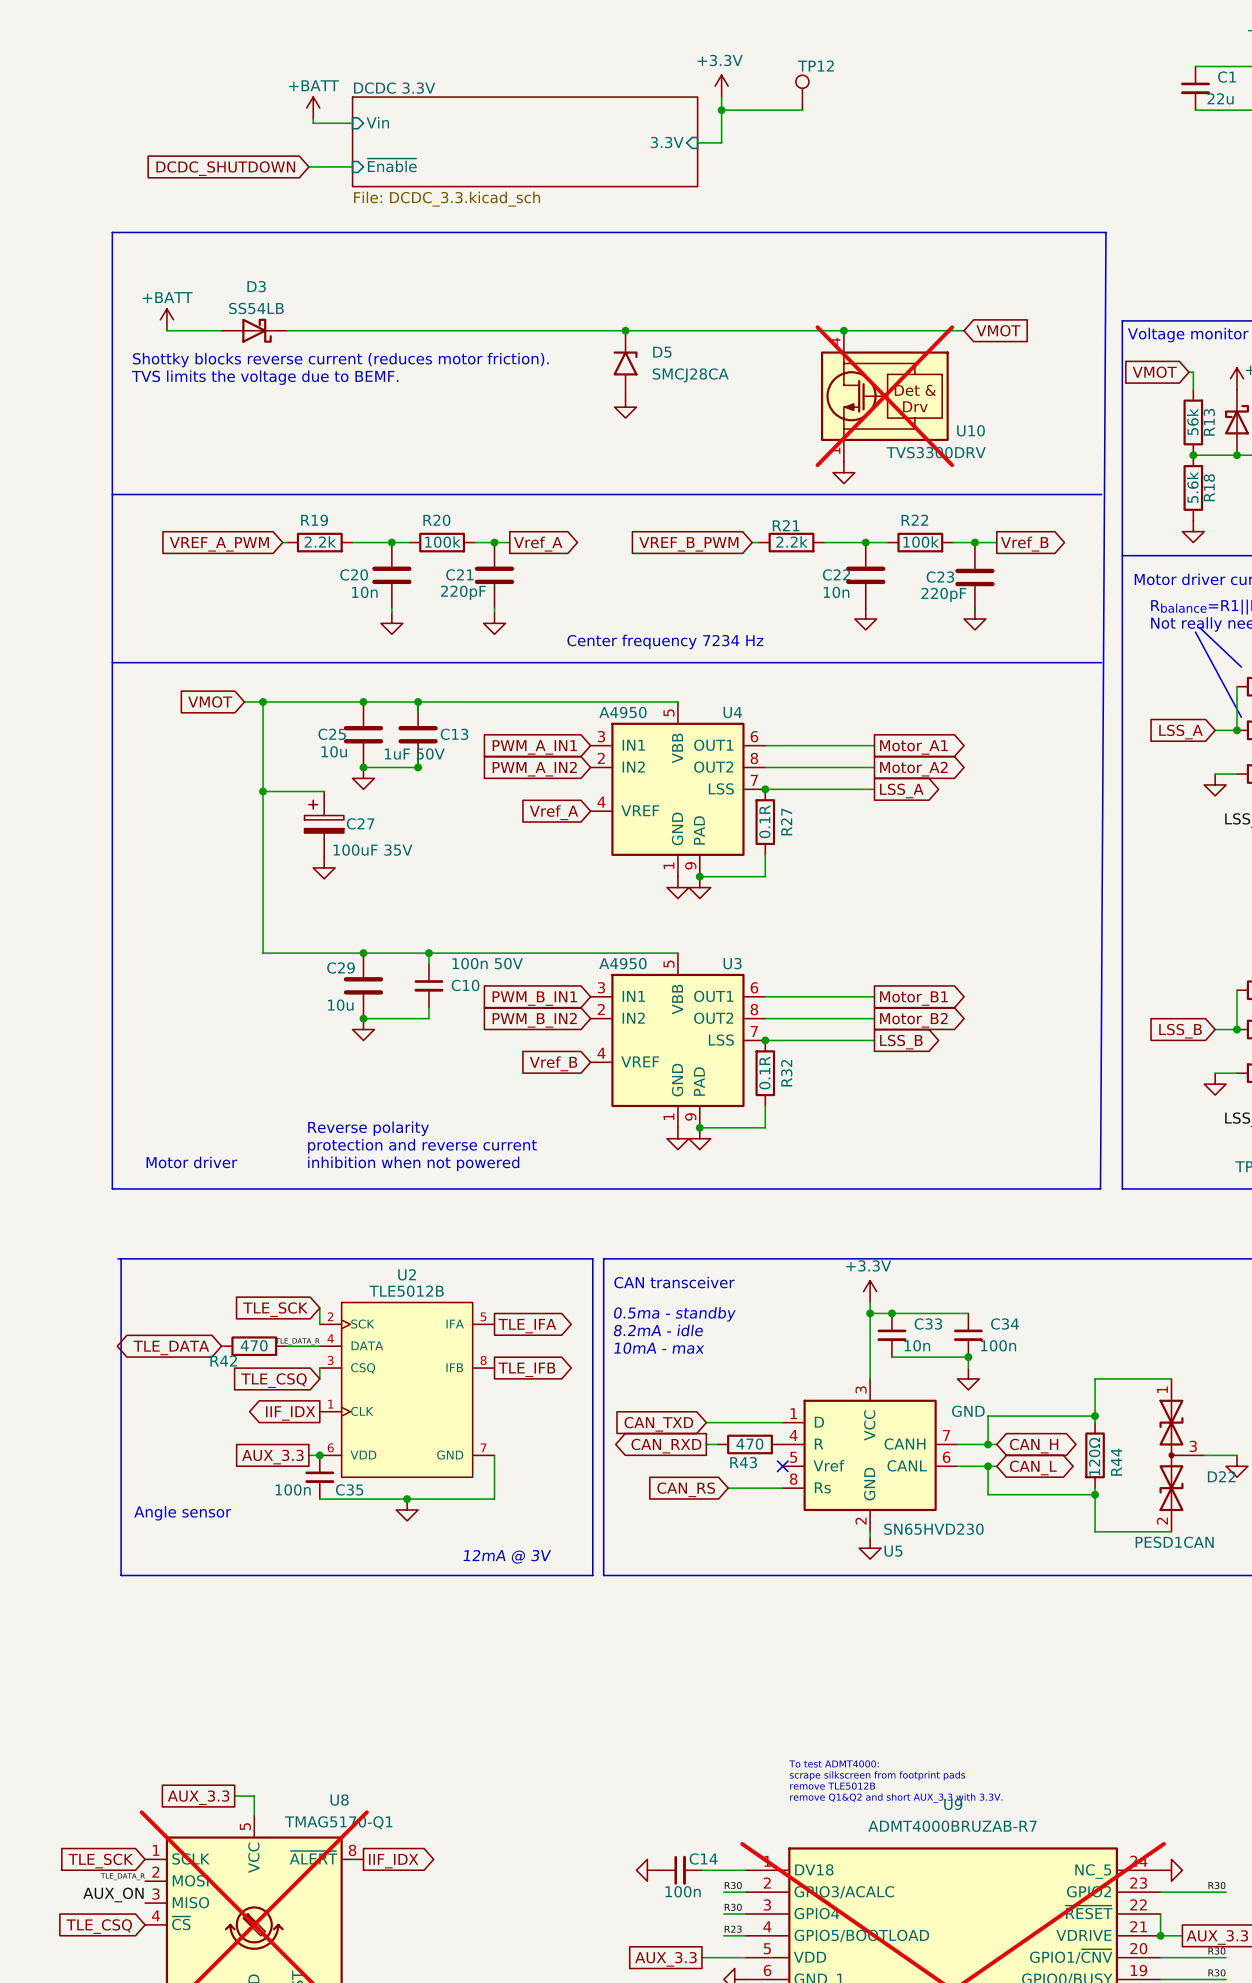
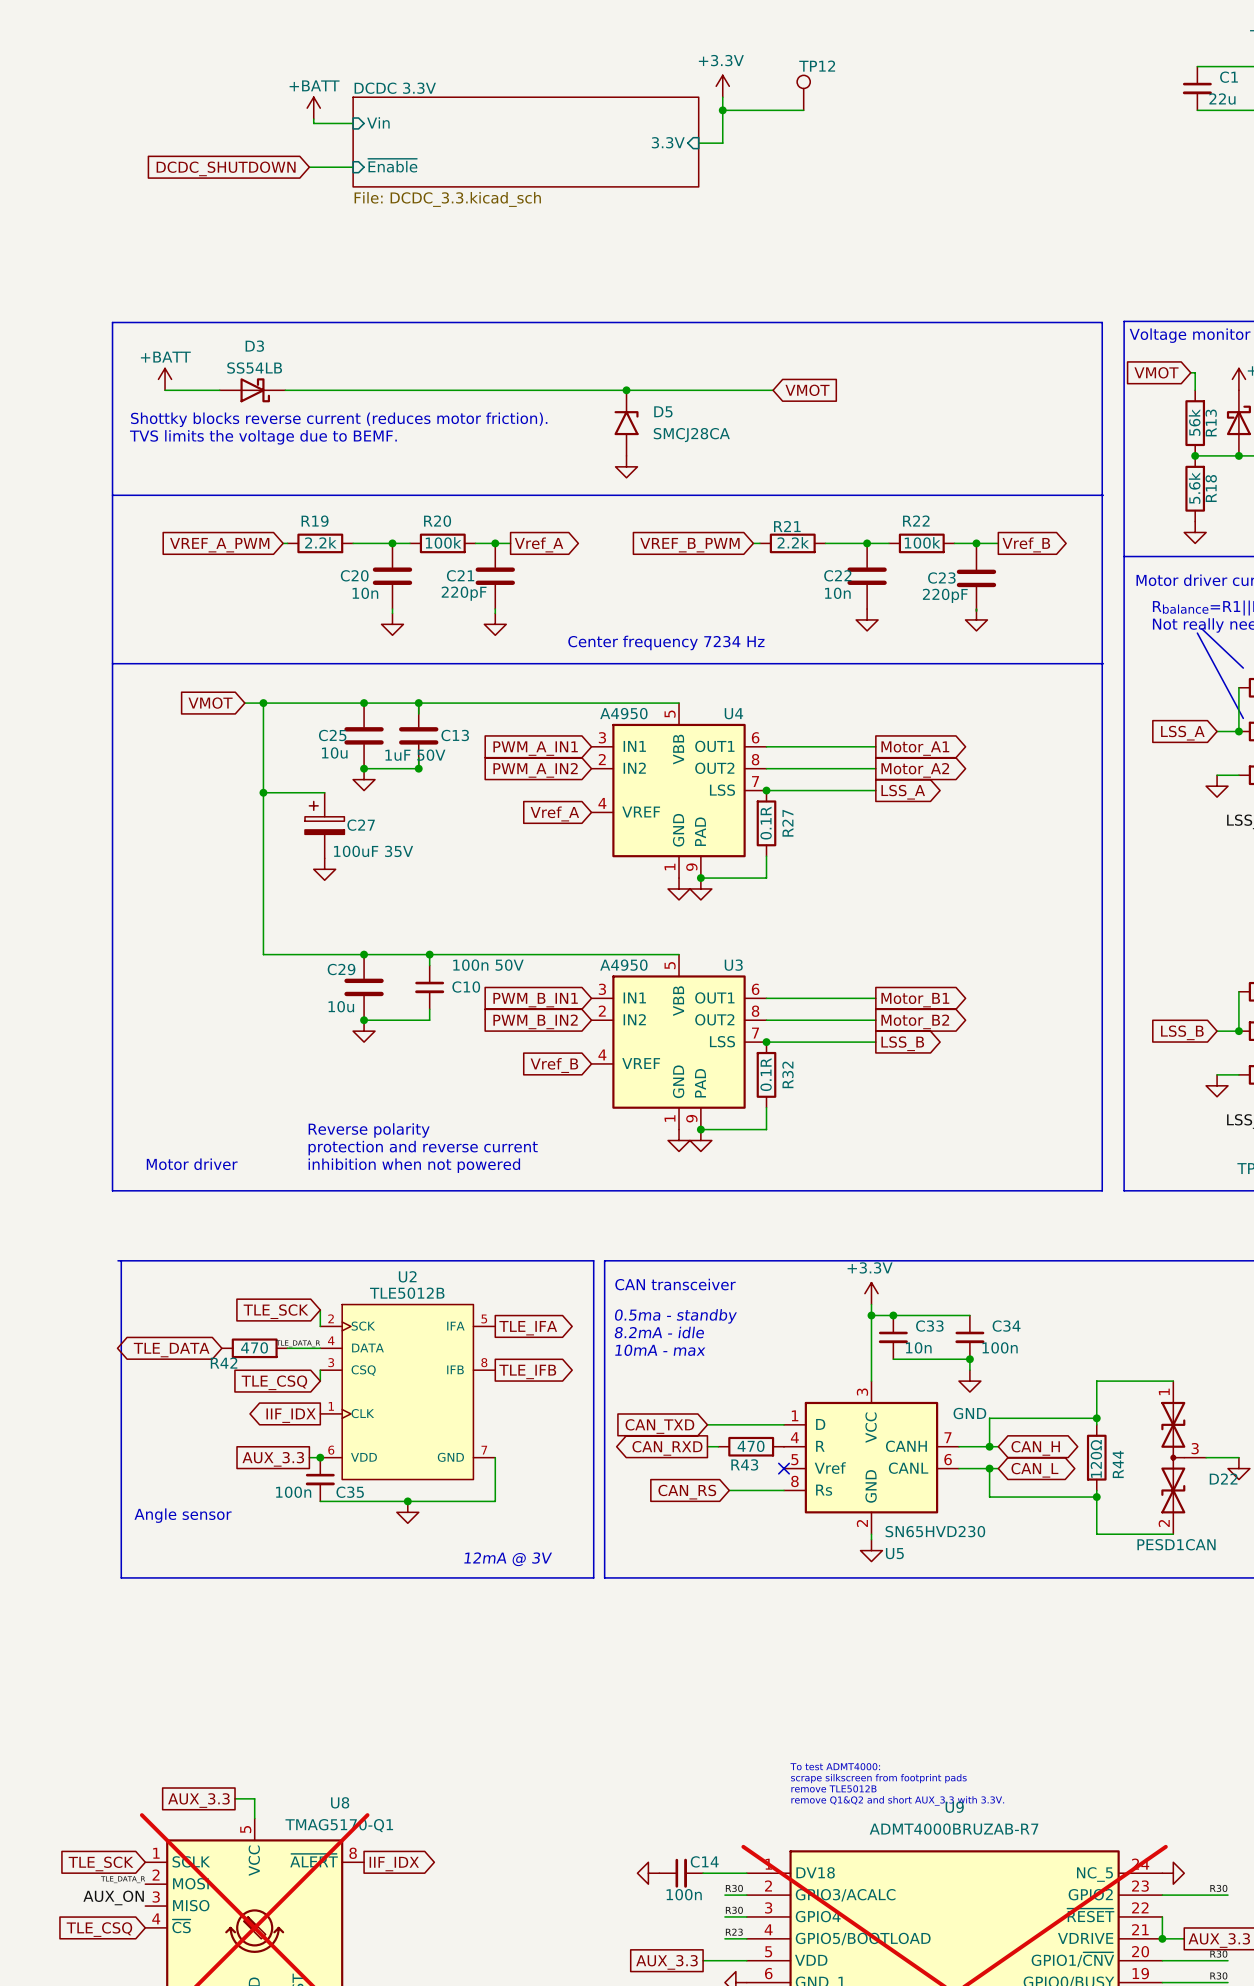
power symbol position: +BATT (166, 319) -> +BATT (165, 379)
line: (112, 322) (112, 232) (1105, 232) (1100, 1188) -> (112, 322) (1102, 322) (1102, 1190)
wire: (166, 330) (221, 330) -> (165, 390) (219, 390)
D3 position: (254, 330) -> (252, 390)
wire: (287, 330) (964, 330) -> none
junction: (625, 330) -> none
junction: (843, 330) -> none
global label position: VMOT (998, 330) -> VMOT (807, 390)
text position: Shottky blocks reverse current (reduces motor friction). (340, 360) -> Shottky blocks reverse current (reduces motor friction). (339, 419)
D5 position: (625, 363) -> (626, 423)
text position: TVS limits the voltage due to BEMF. (265, 377) -> TVS limits the voltage due to BEMF. (263, 437)
wire: none -> (285, 390) (773, 390)
junction: none -> (626, 390)
U10: TVS3300DRV (884, 396) -> none
power symbol position: (625, 407) -> (626, 466)
power symbol: (843, 472) -> none

